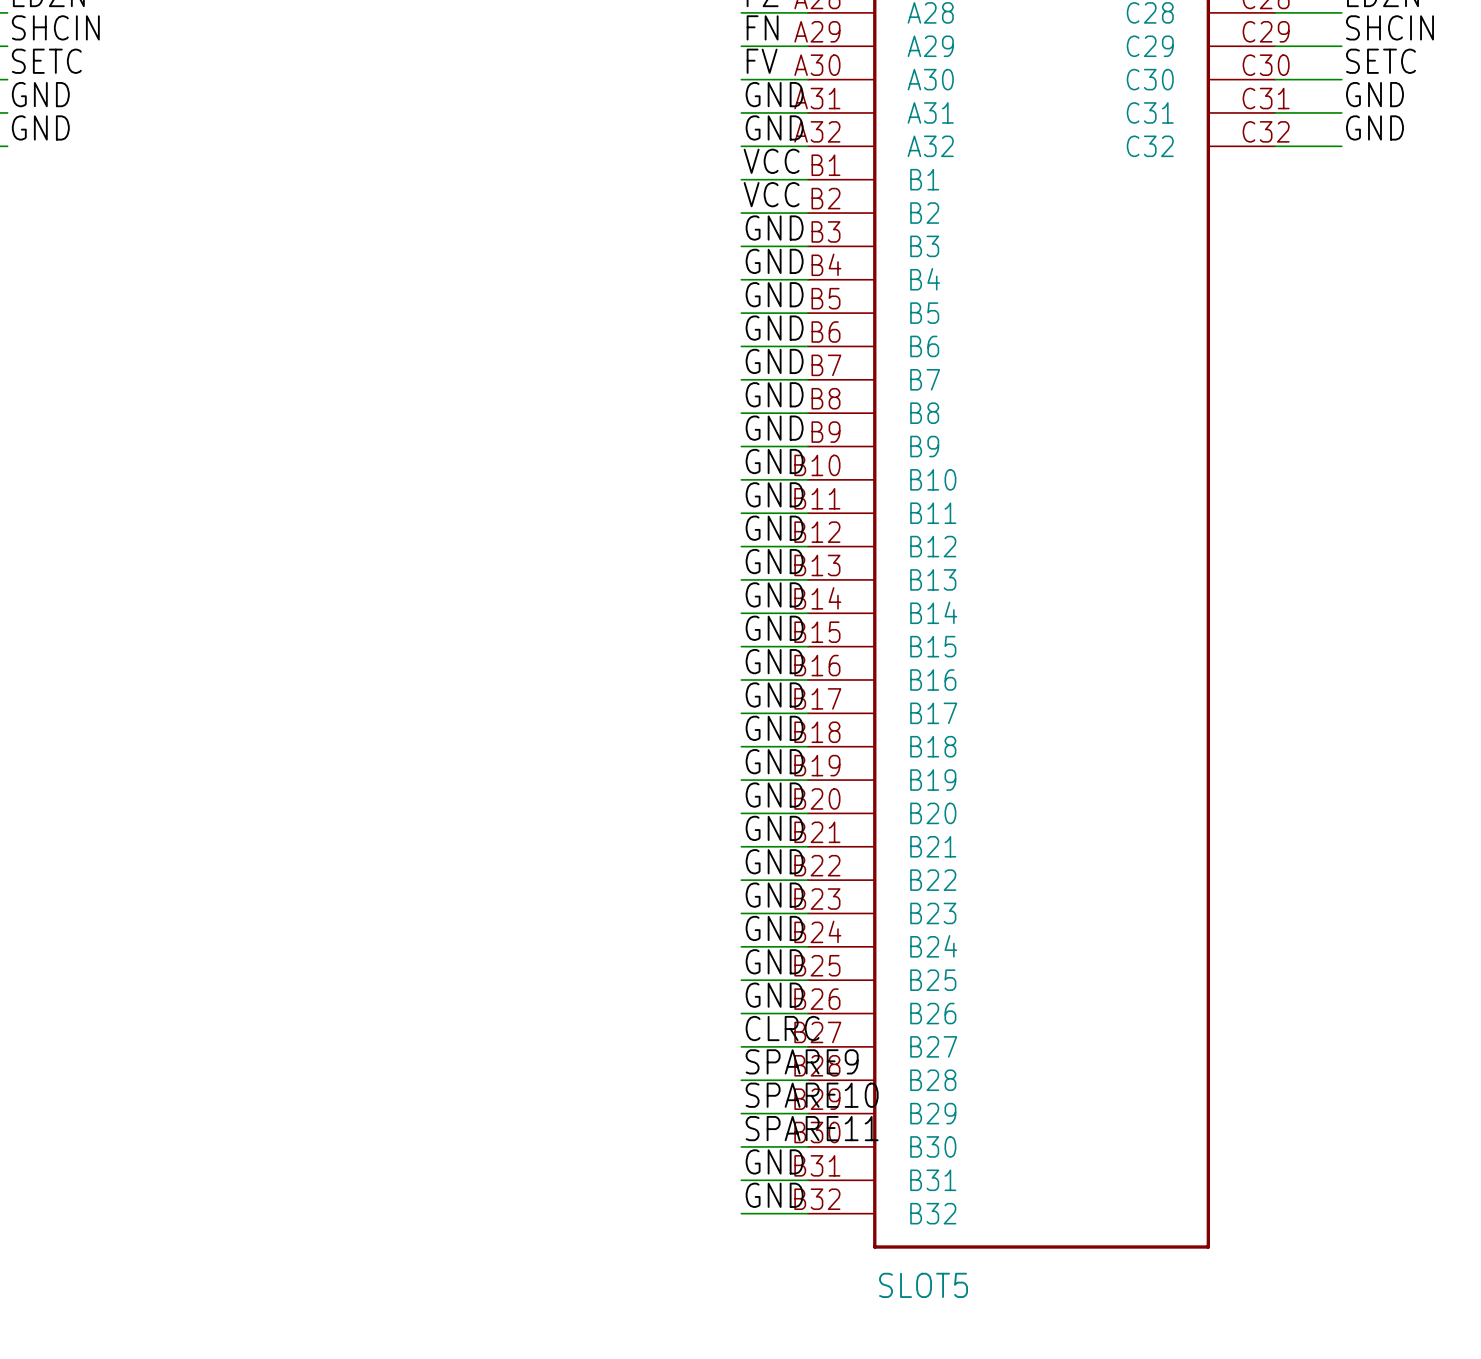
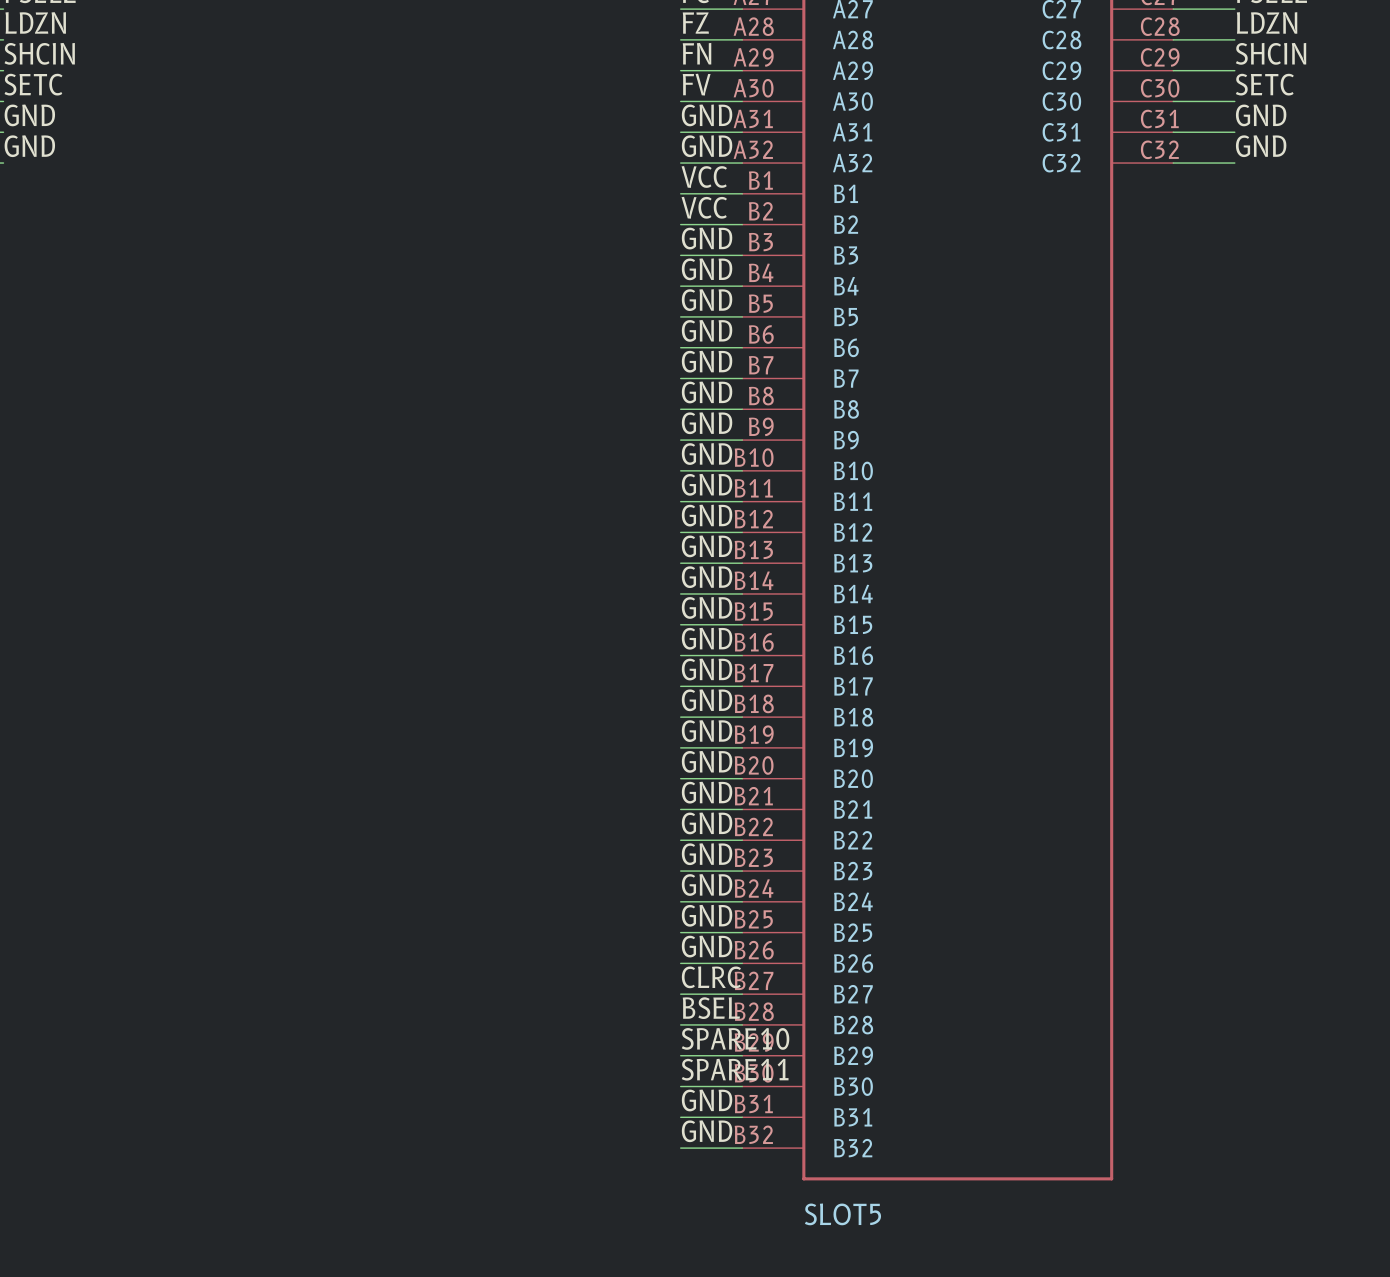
label: SPARE9 (802, 1061) -> BSEL (711, 1008)

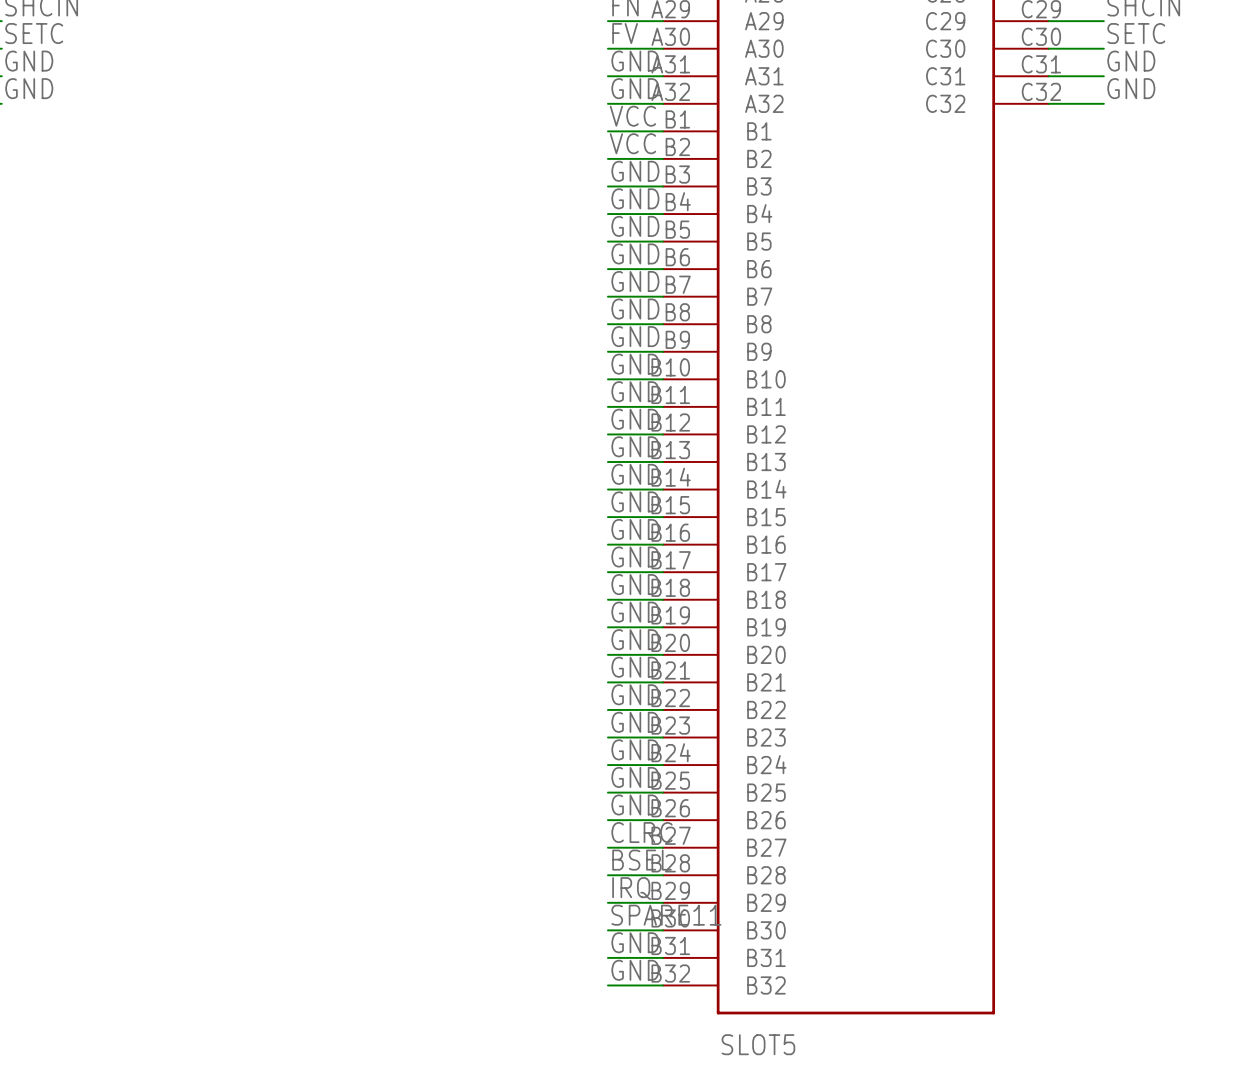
label: SPARE10 (735, 1038) -> IRQ (631, 888)

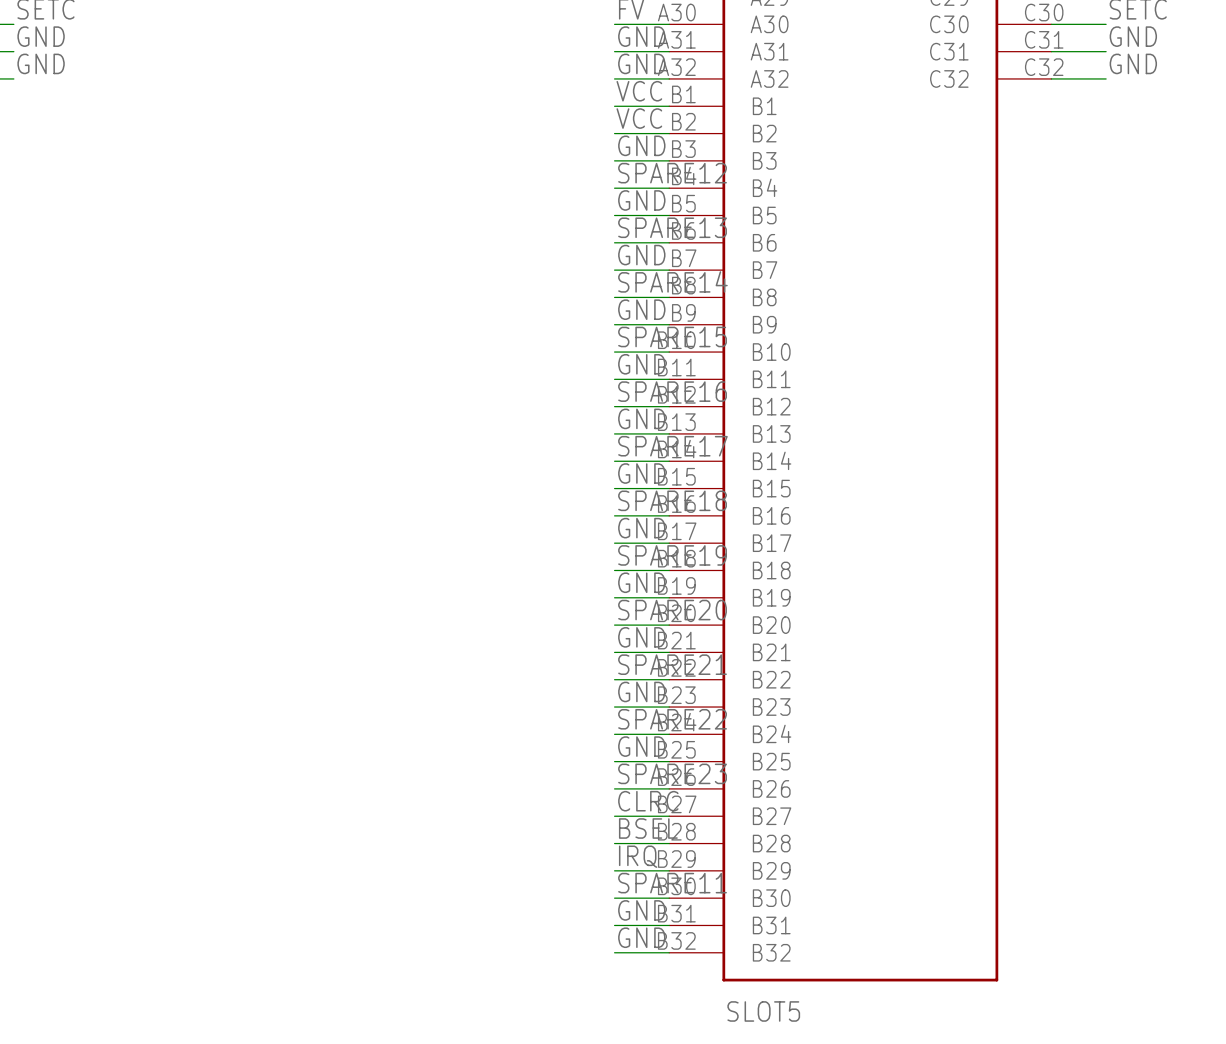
label: GND (635, 198) -> SPARE12 (672, 173)
label: GND (635, 253) -> SPARE13 (672, 227)
label: GND (635, 309) -> SPARE14 (672, 281)
label: GND (635, 364) -> SPARE15 (672, 336)
label: GND (635, 419) -> SPARE16 (672, 391)
label: GND (635, 474) -> SPARE17 (672, 446)
label: GND (635, 529) -> SPARE18 (672, 500)
label: GND (635, 584) -> SPARE19 (672, 555)
label: GND (635, 639) -> SPARE20 (672, 610)
label: GND (635, 694) -> SPARE21 (672, 664)
label: GND (635, 749) -> SPARE22 (672, 719)
label: GND (635, 804) -> SPARE23 (672, 773)

